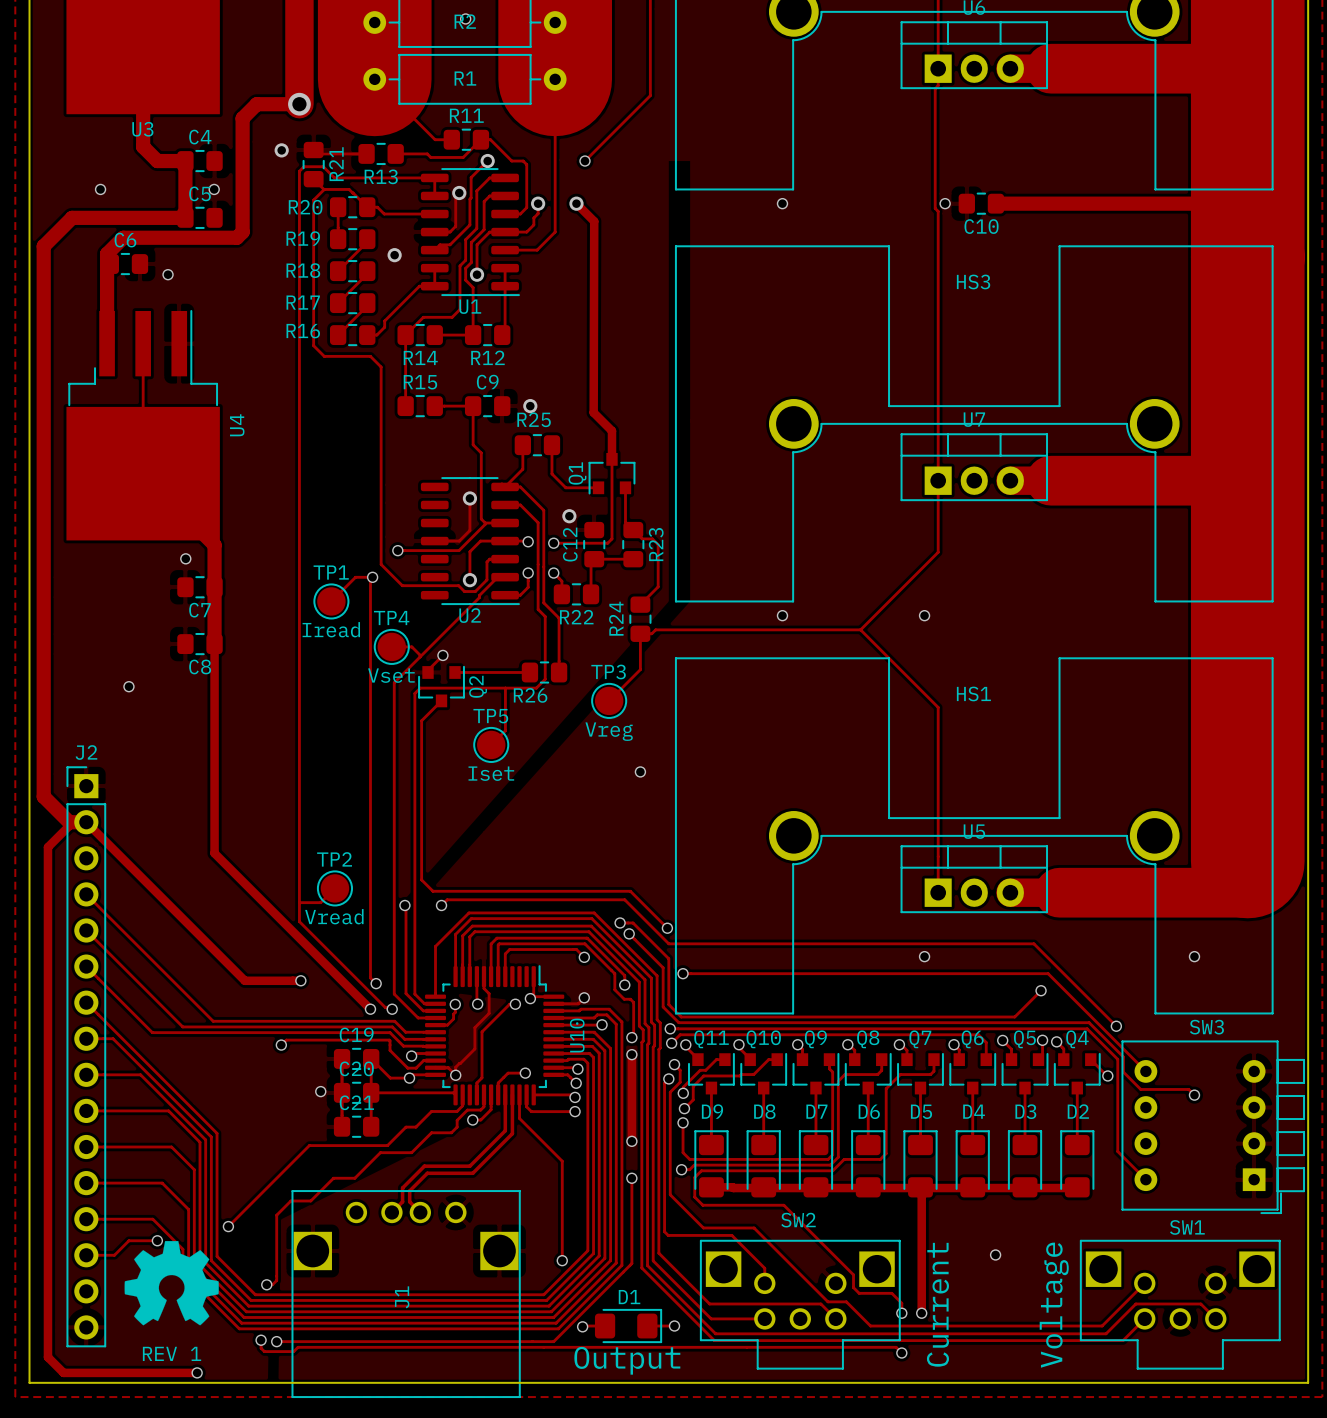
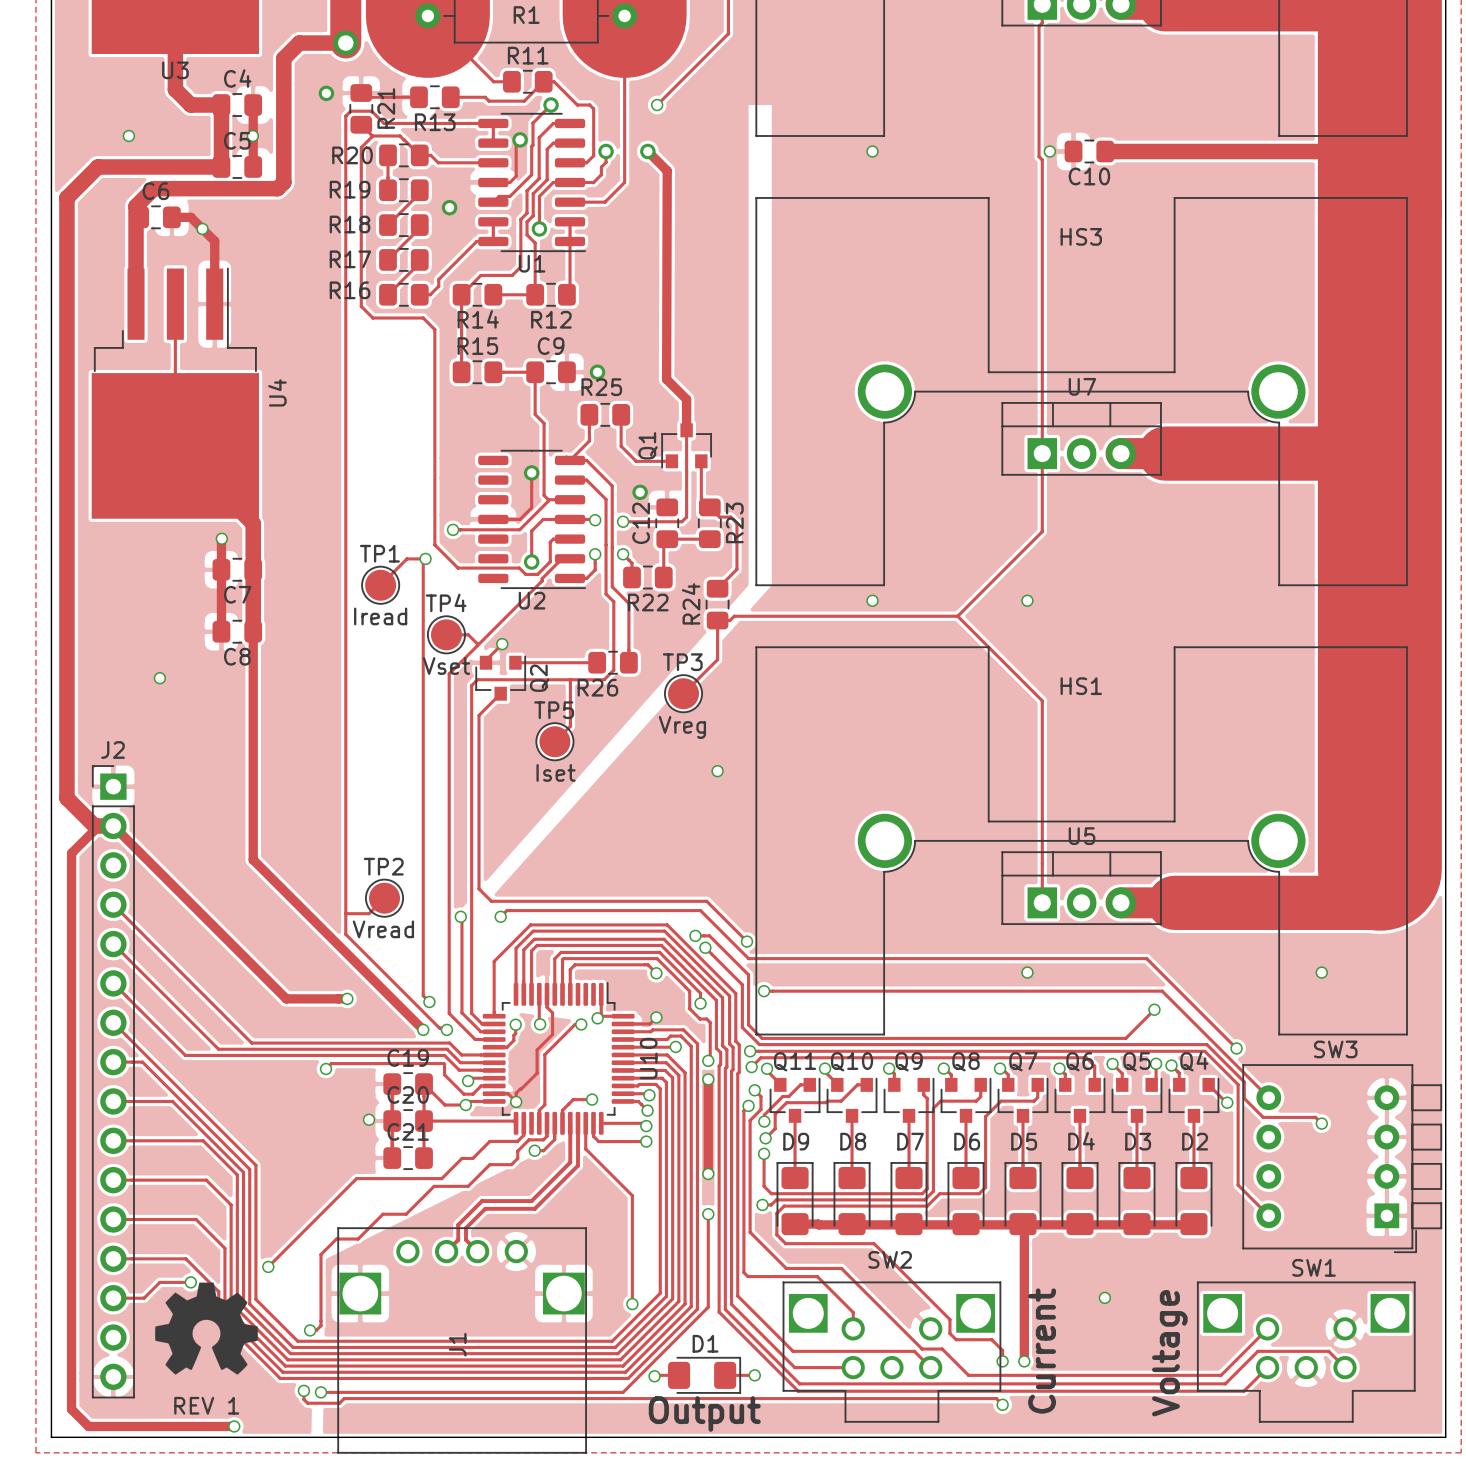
track: none -> (253, 105) (253, 166)
track: none -> (171, 217) (190, 217) (214, 241) (214, 304)
track: none -> (221, 539) (221, 631)

